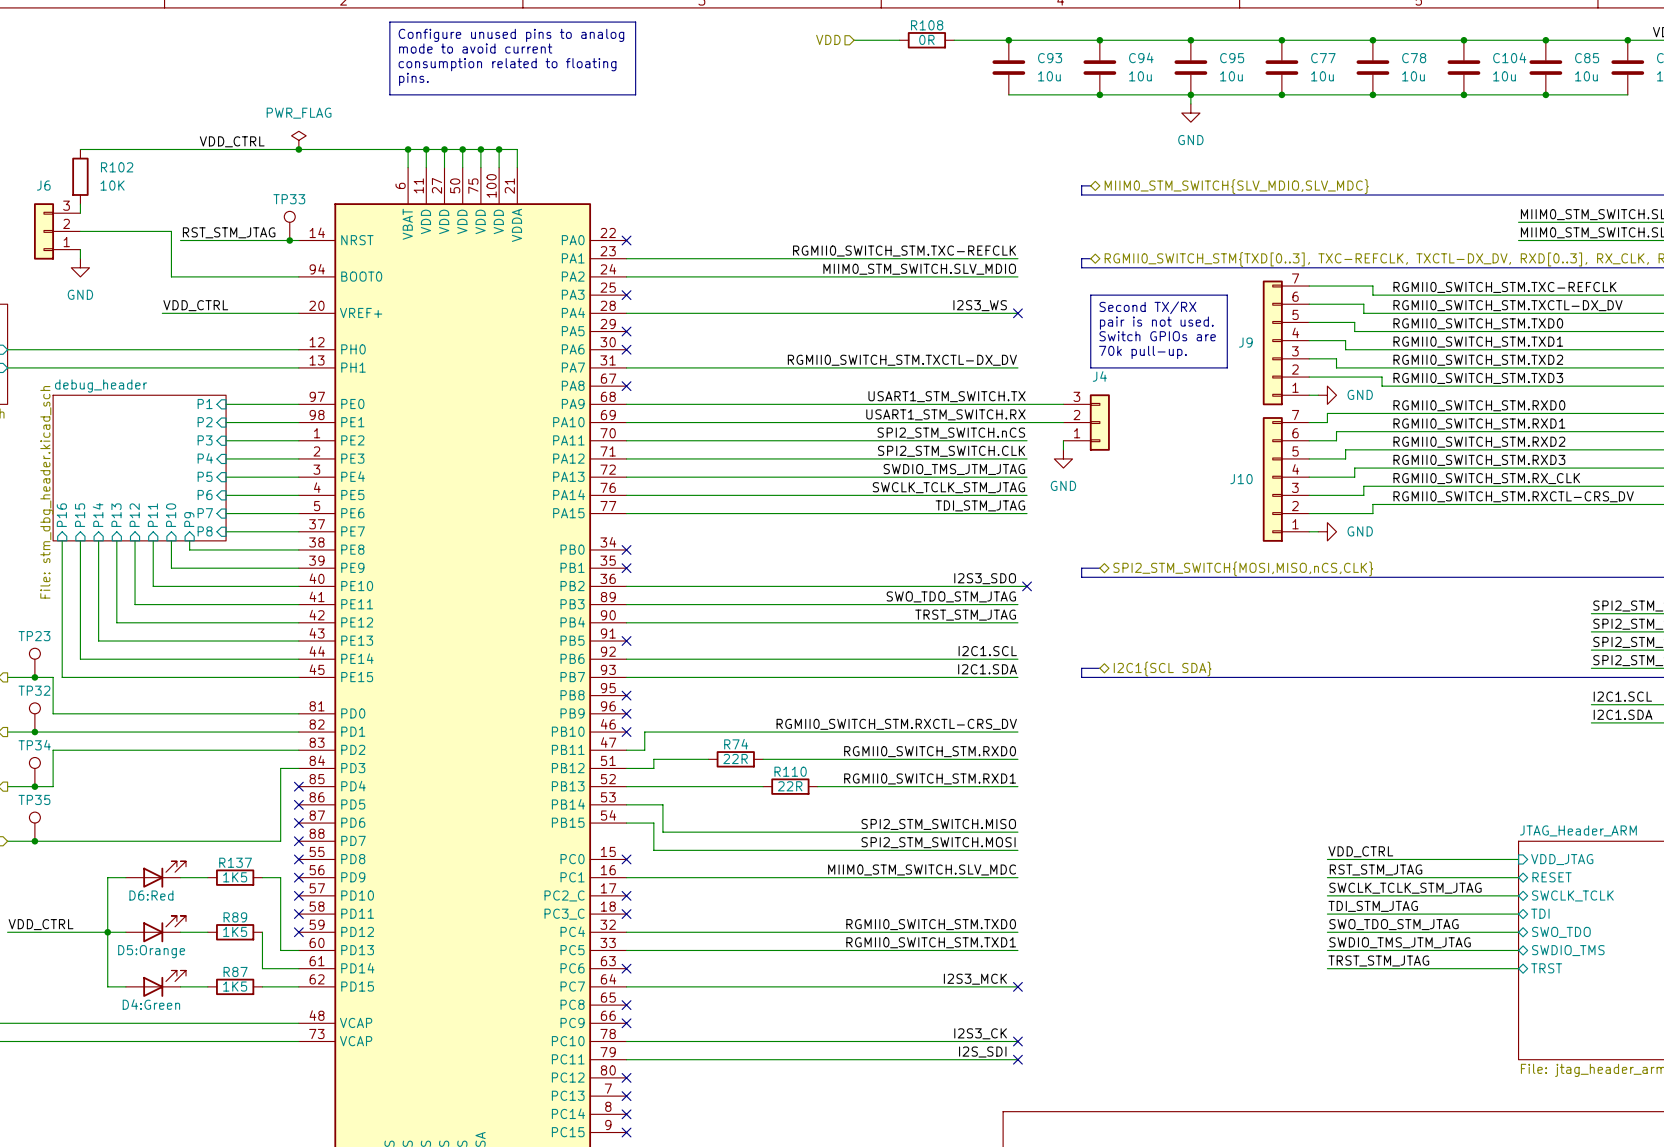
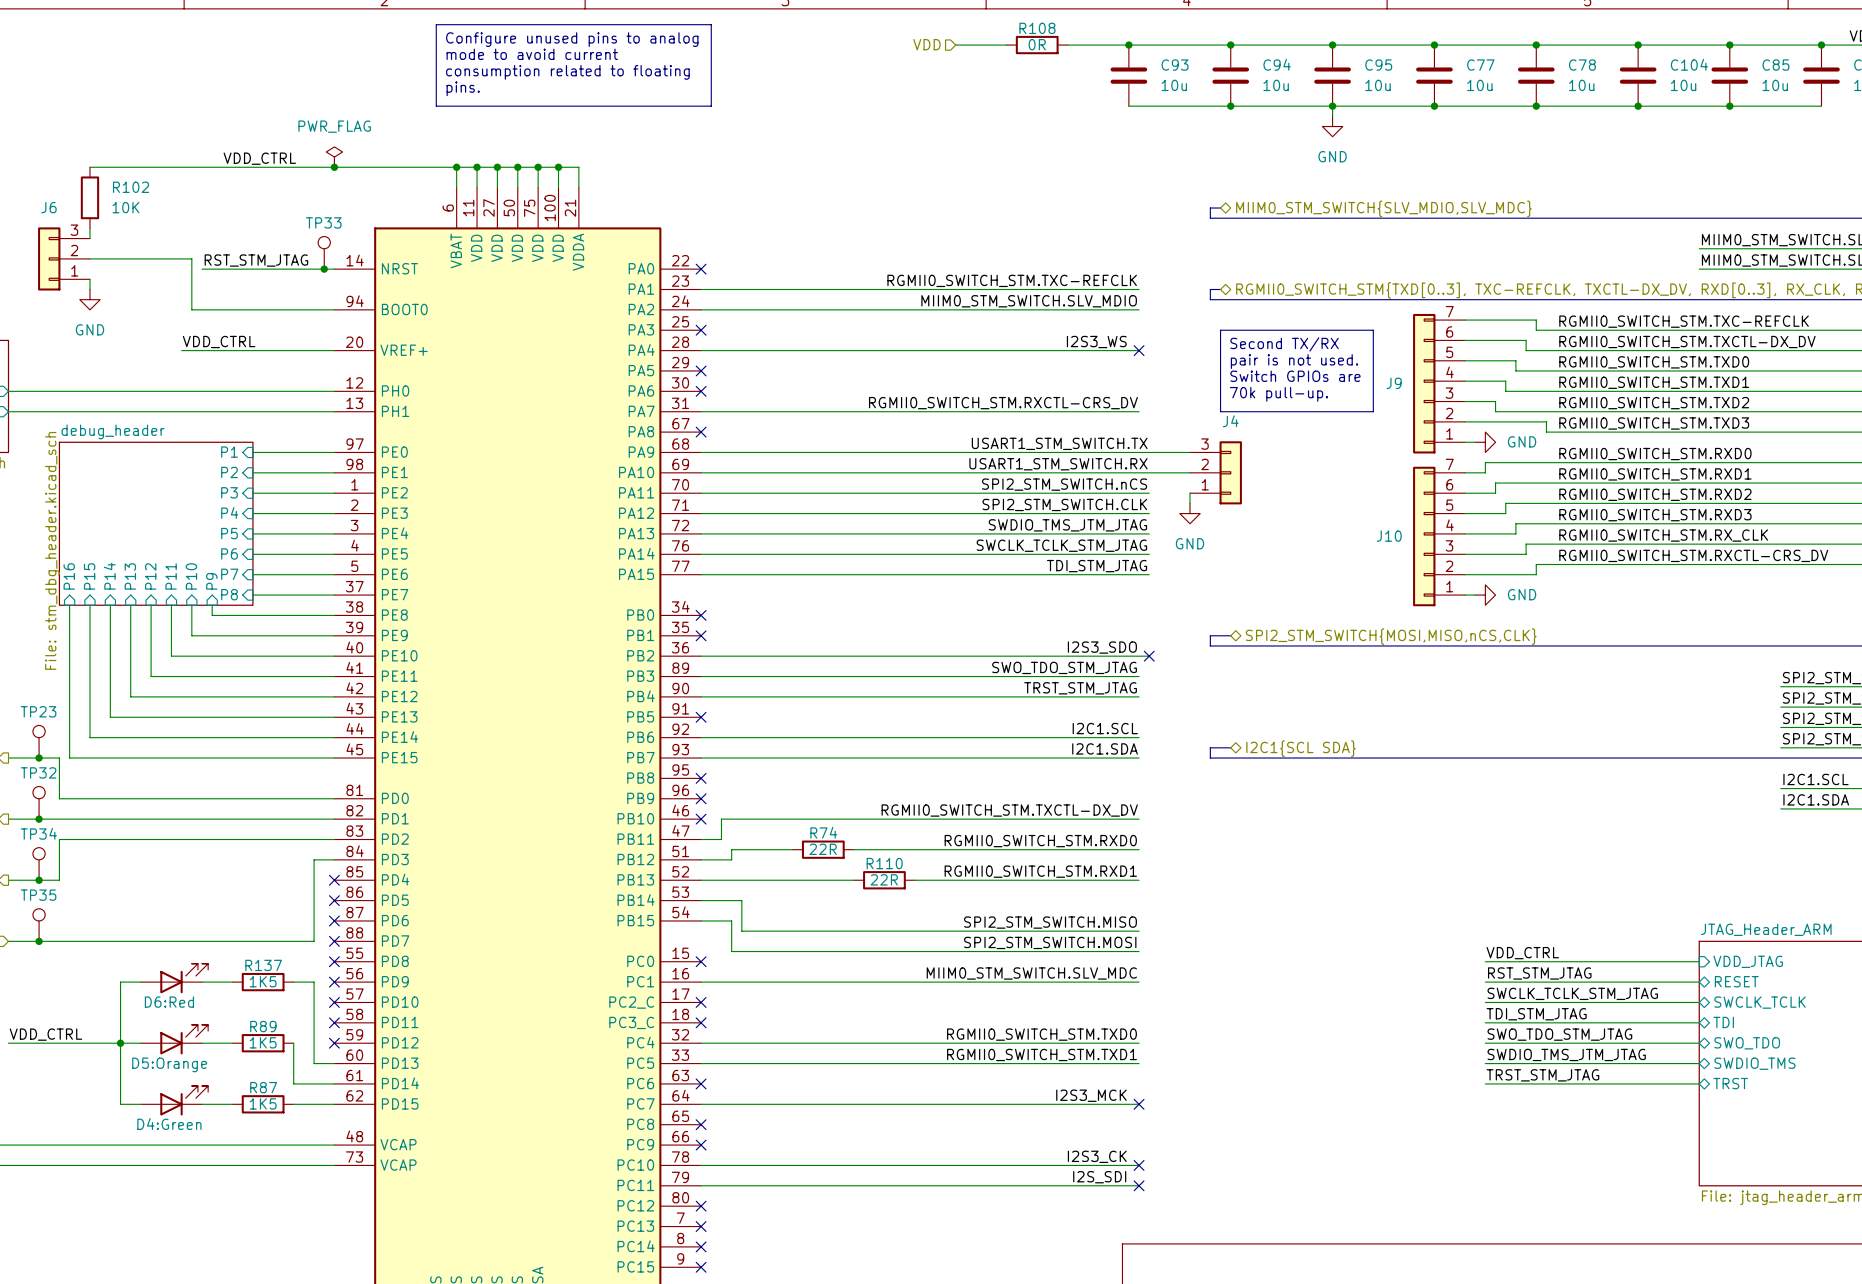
label: RGMII0_SWITCH_STM.TXCTL-DX_DV (902, 360) -> RGMII0_SWITCH_STM.RXCTL-CRS_DV (1003, 403)
label: RGMII0_SWITCH_STM.RXCTL-CRS_DV (896, 724) -> RGMII0_SWITCH_STM.TXCTL-DX_DV (1009, 810)

